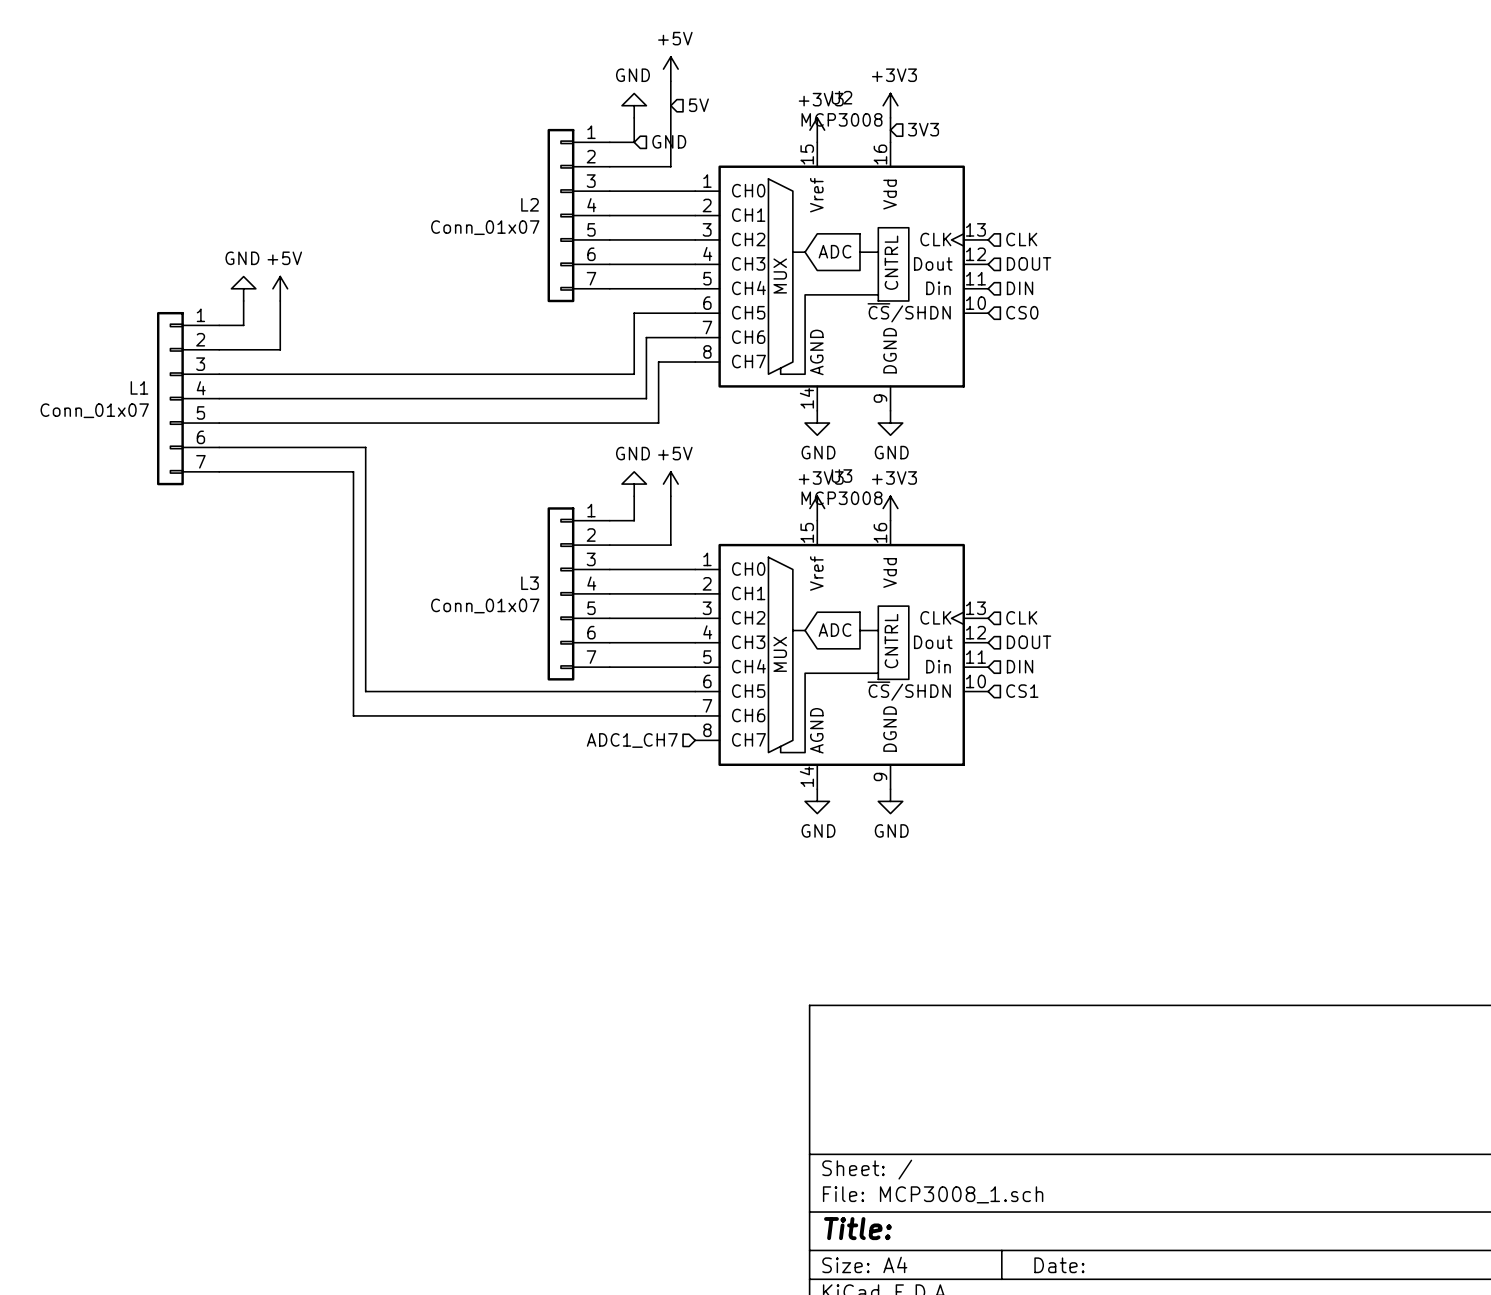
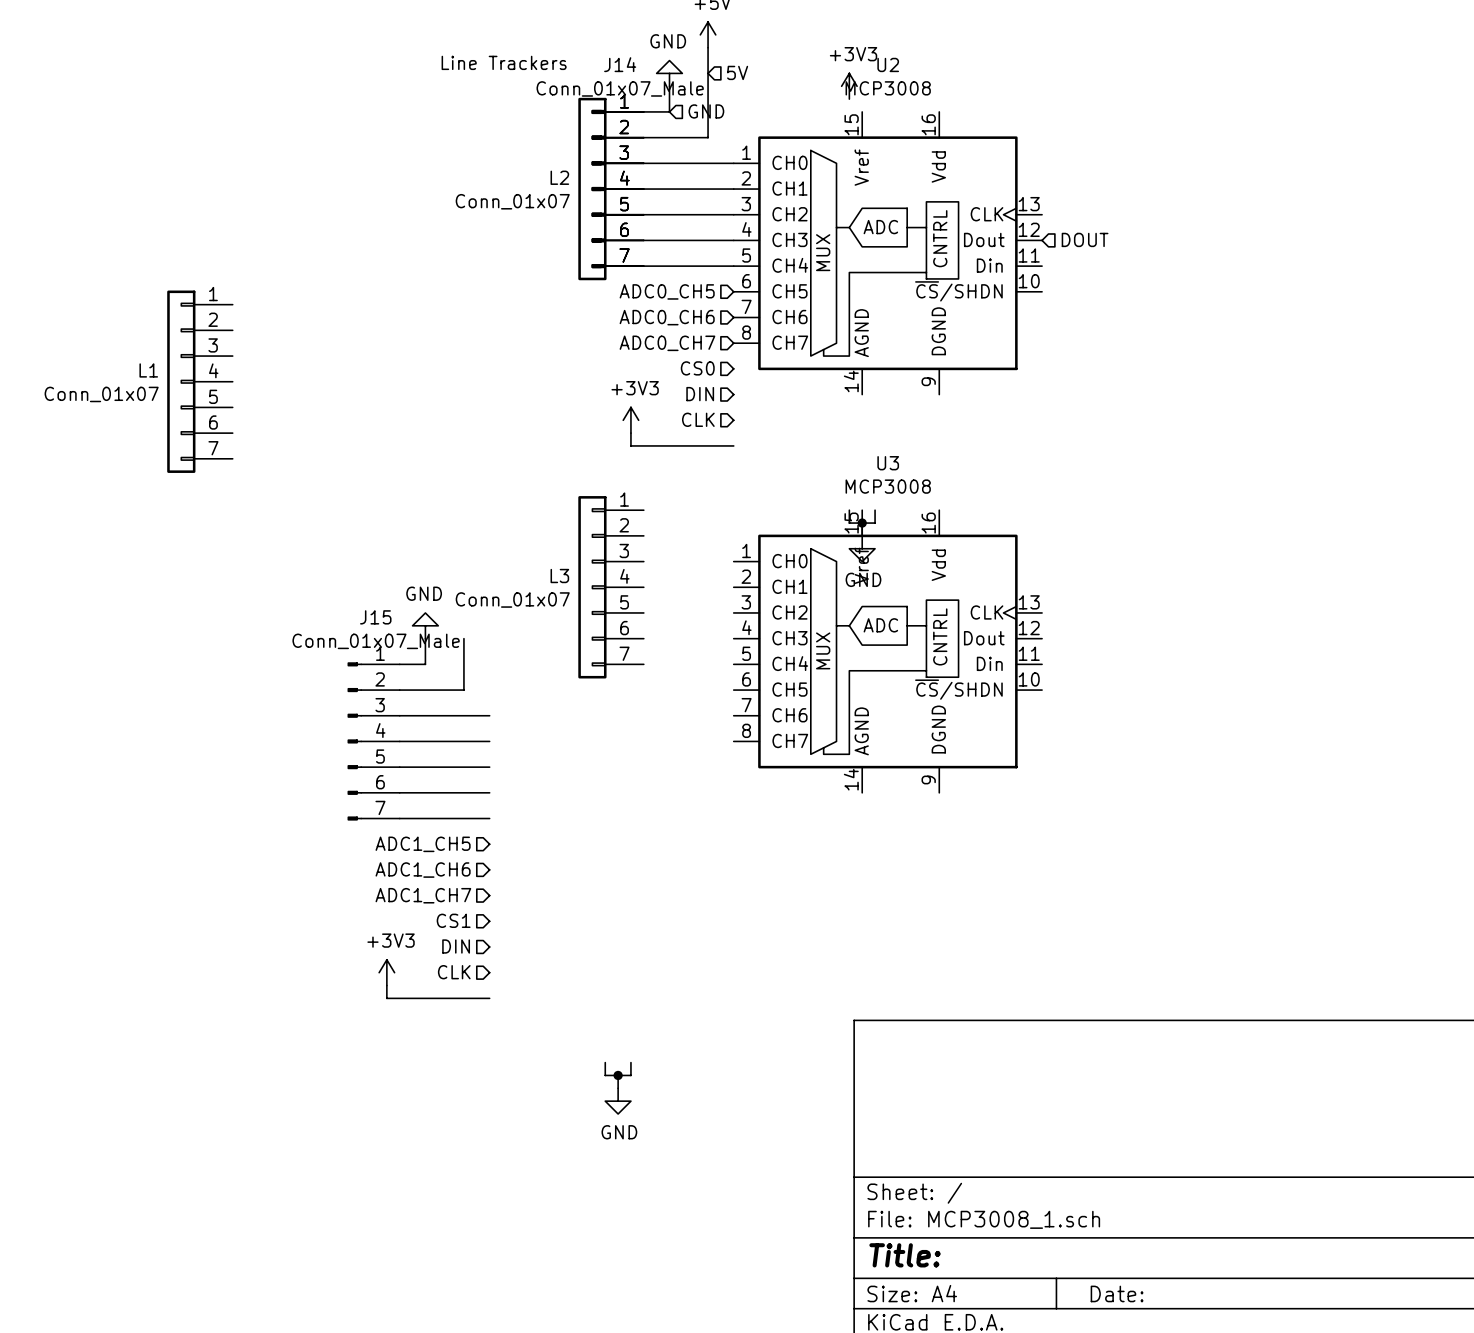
text: none -> Line Trackers (504, 62)
power symbol: +3V3 (890, 105) -> none
wire: (890, 117) (890, 142) -> none
hierarchical label: 3V3 (923, 129) -> none
power symbol position: +3V3 (817, 130) -> +3V3 (849, 86)
J14: none -> Conn_01x07_Male (617, 189)
hierarchical label: CLK (1021, 239) -> none
power symbol: GND (243, 288) -> none
power symbol: +5V (280, 288) -> none
hierarchical label: DIN (1020, 288) -> none
wire: (243, 300) (243, 325) (219, 325) -> none
wire: (280, 300) (280, 349) (219, 349) -> none
hierarchical label: CS0 (1022, 312) -> none
hierarchical label: none -> ADC0_CH5 (667, 291)
wire: (695, 313) (634, 313) (634, 374) (219, 374) -> none
hierarchical label: none -> ADC0_CH6 (667, 317)
wire: (695, 337) (646, 337) (646, 398) (219, 398) -> none
hierarchical label: none -> ADC0_CH7 (667, 343)
wire: (695, 362) (658, 362) (658, 423) (219, 423) -> none
hierarchical label: none -> CS0 (697, 368)
hierarchical label: none -> DIN (700, 394)
power symbol: GND (817, 423) -> none
power symbol: GND (890, 423) -> none
hierarchical label: none -> CLK (698, 419)
power symbol: none -> +3V3 (630, 420)
wire: (219, 447) (365, 447) (365, 691) (377, 691) -> none
wire: none -> (630, 433) (630, 445) (733, 445)
wire: (219, 471) (353, 471) (353, 715) (377, 715) -> none
power symbol: GND (634, 484) -> none
power symbol: +5V (670, 484) -> none
wire: (634, 496) (634, 520) (609, 520) -> none
wire: (670, 496) (670, 545) (609, 545) -> none
power symbol: +3V3 (817, 508) -> none
power symbol: +3V3 (890, 508) -> none
wire: none -> (849, 510) (849, 523) (875, 523) (875, 510)
junction: none -> (862, 523)
power symbol: none -> GND (862, 548)
wire: (609, 569) (695, 569) -> none
wire: (609, 593) (695, 593) -> none
hierarchical label: CLK (1021, 617) -> none
wire: (609, 618) (695, 618) -> none
power symbol: none -> GND (425, 625)
wire: none -> (425, 638) (425, 664) (399, 664)
wire: (609, 642) (695, 642) -> none
hierarchical label: DOUT (1029, 642) -> none
hierarchical label: DIN (1020, 666) -> none
wire: (609, 667) (695, 667) -> none
wire: (438, 691) (695, 691) -> (463, 690) (463, 638)
hierarchical label: CS1 (1022, 691) -> none
wire: (463, 715) (695, 715) -> none
J15: none -> Conn_01x07_Male (373, 741)
wire: none -> (399, 741) (489, 741)
hierarchical label: ADC1_CH7 (632, 740) -> none
wire: none -> (399, 767) (489, 767)
wire: none -> (399, 792) (489, 792)
power symbol: GND (817, 801) -> none
power symbol: GND (890, 801) -> none
wire: none -> (399, 818) (489, 818)
hierarchical label: none -> ADC1_CH5 (423, 844)
hierarchical label: none -> ADC1_CH6 (423, 870)
hierarchical label: none -> ADC1_CH7 (423, 895)
hierarchical label: none -> CS1 (453, 920)
hierarchical label: none -> DIN (456, 946)
hierarchical label: none -> CLK (454, 972)
power symbol: none -> +3V3 (386, 972)
wire: none -> (386, 985) (386, 998) (489, 998)
wire: none -> (605, 1062) (605, 1075) (630, 1075) (630, 1062)
wire: none -> (618, 1075) (618, 1088)
junction: none -> (618, 1075)
power symbol: none -> GND (618, 1101)

